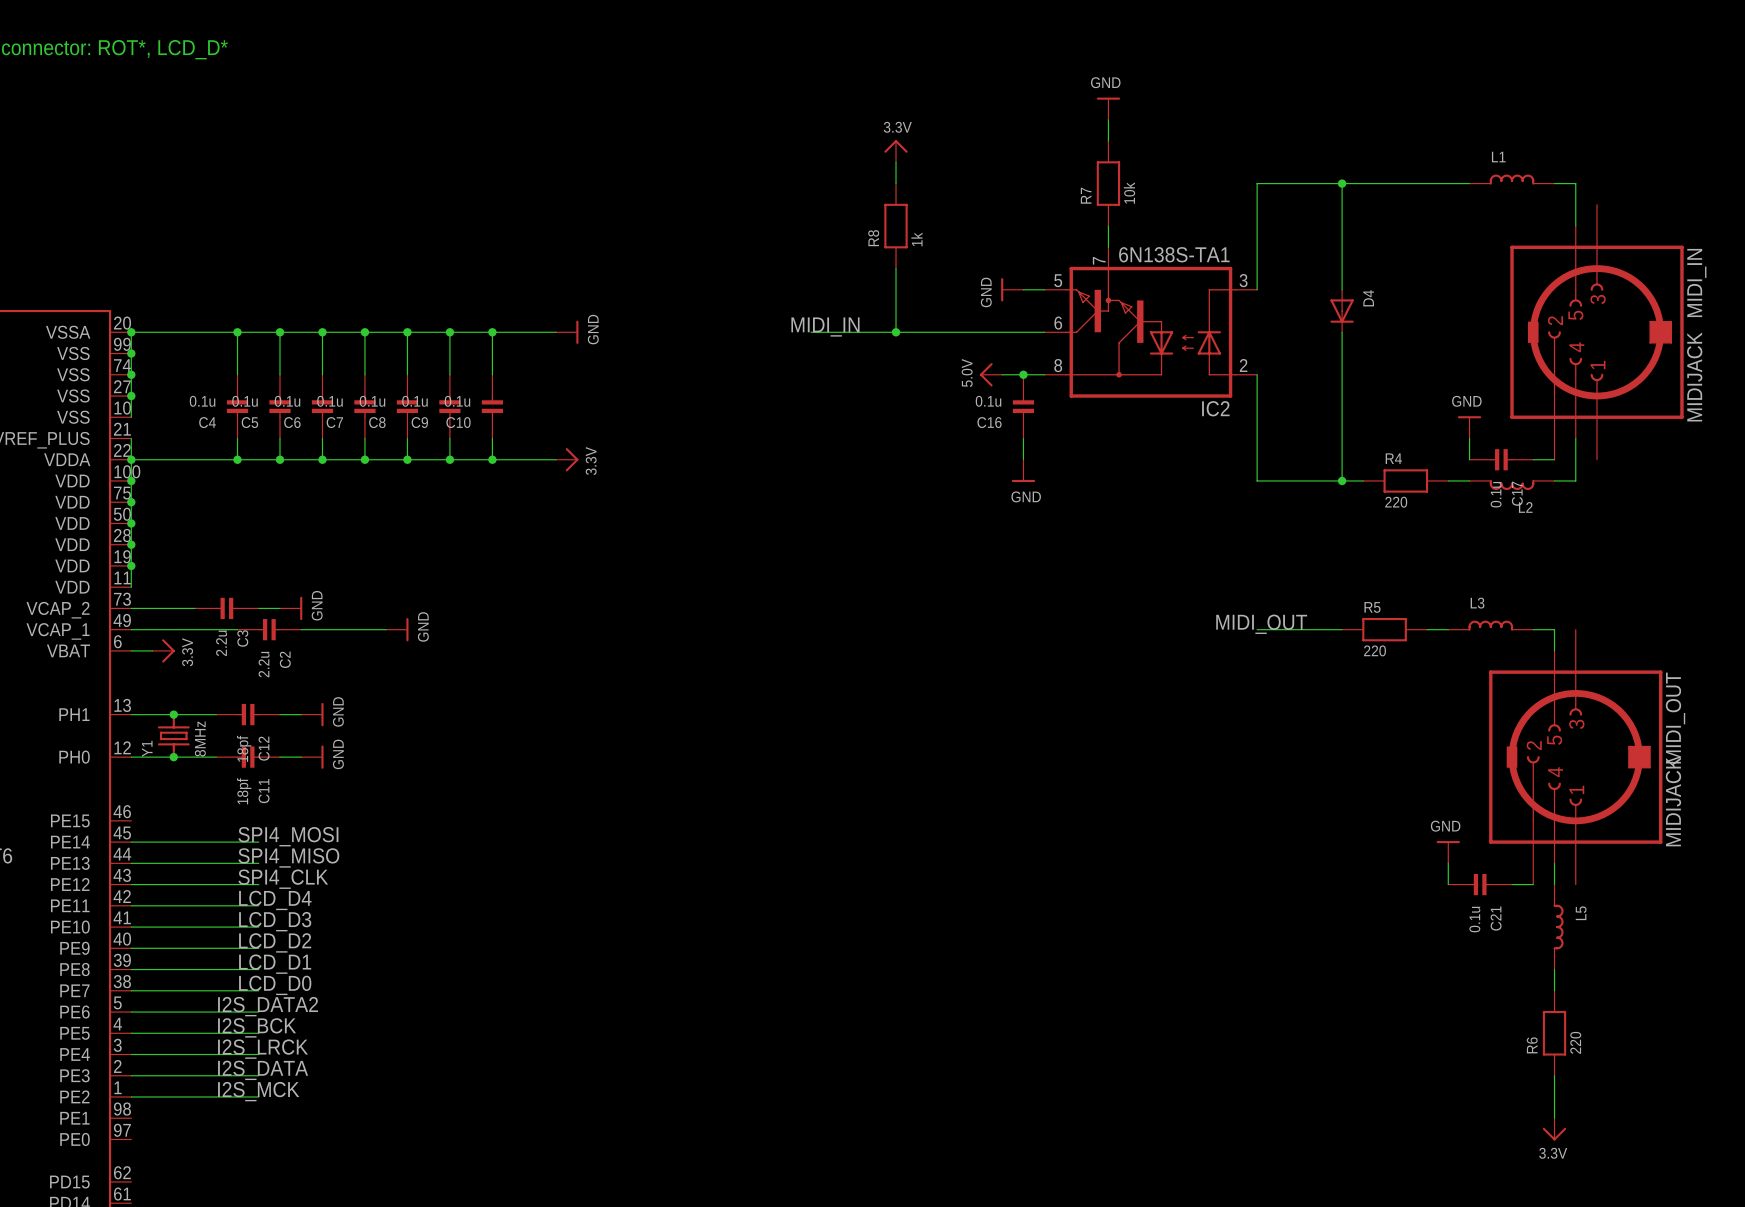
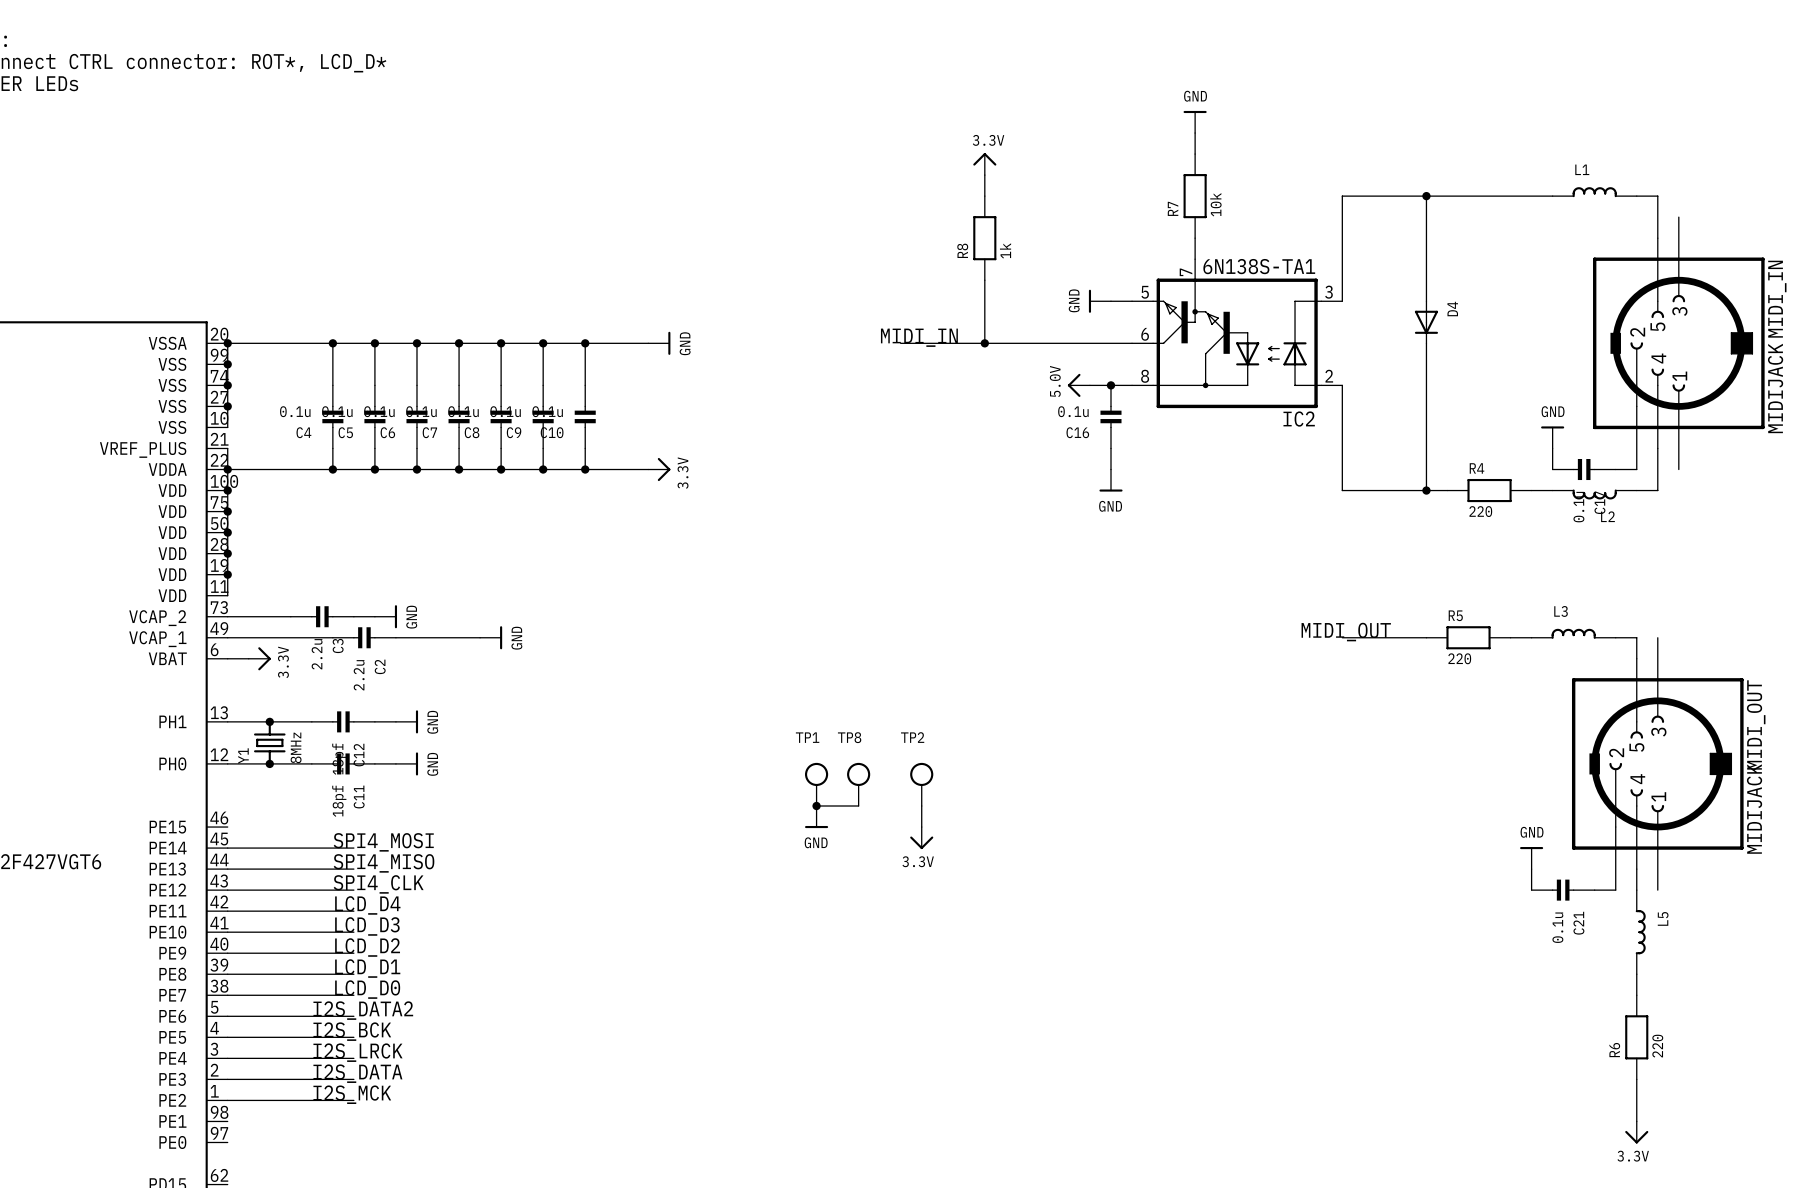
TP1: none -> (816, 784)
TP8: none -> (858, 784)
TP2: none -> (921, 784)
wire: none -> (816, 806) (858, 806)
junction: none -> (816, 806)
wire: none -> (921, 806) (921, 827)
power symbol: none -> GND (816, 817)
power symbol: none -> 3.3V (921, 838)

